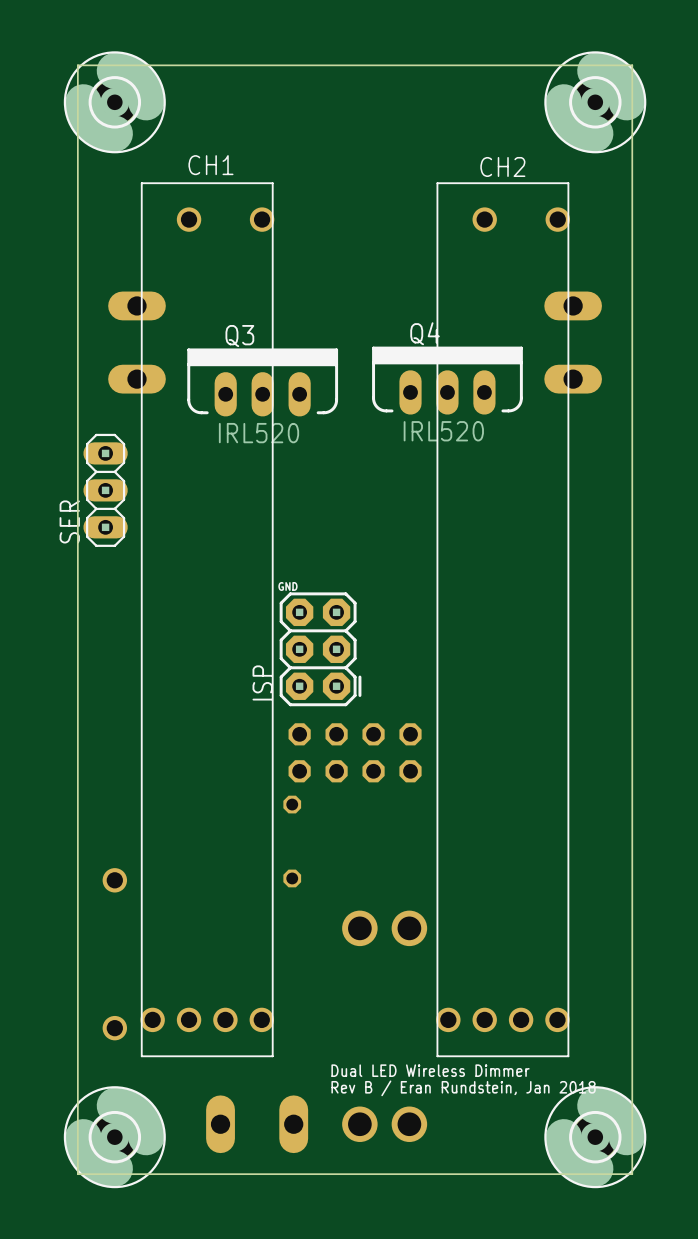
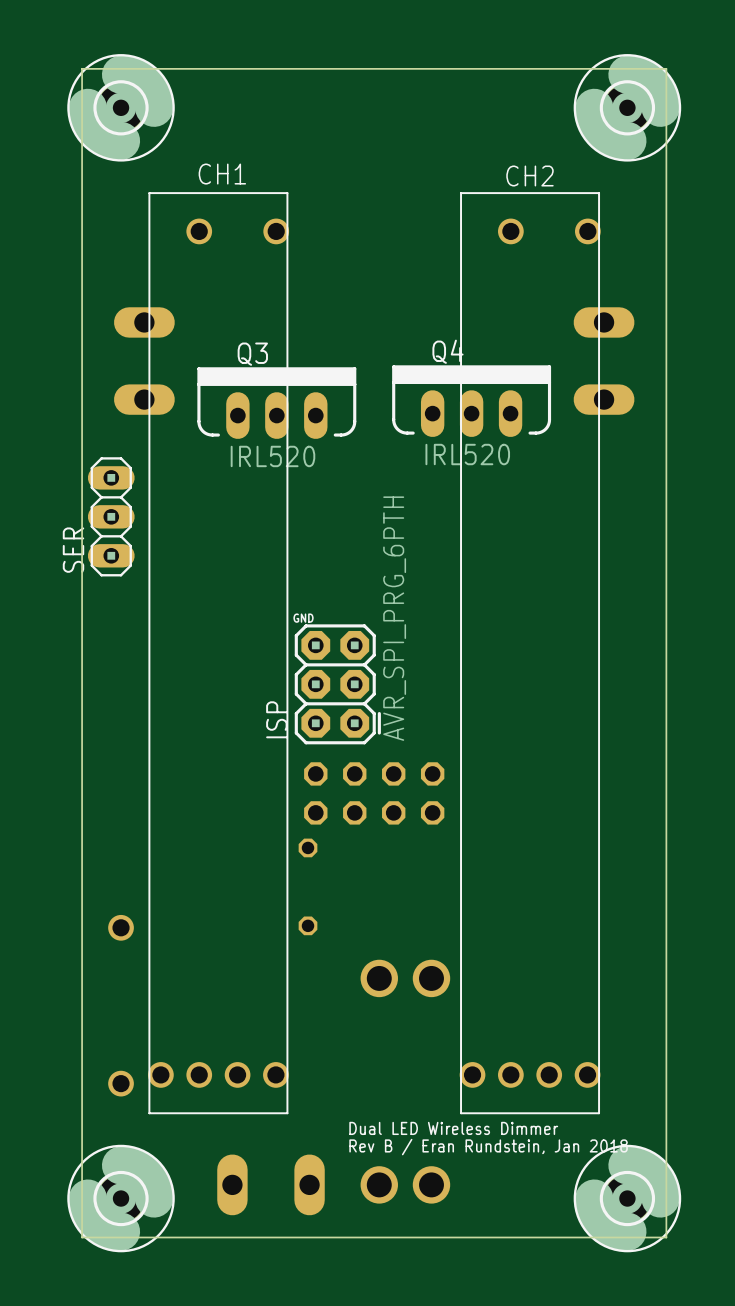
ISP value: none -> AVR_SPI_PRG_6PTH (394, 618)

